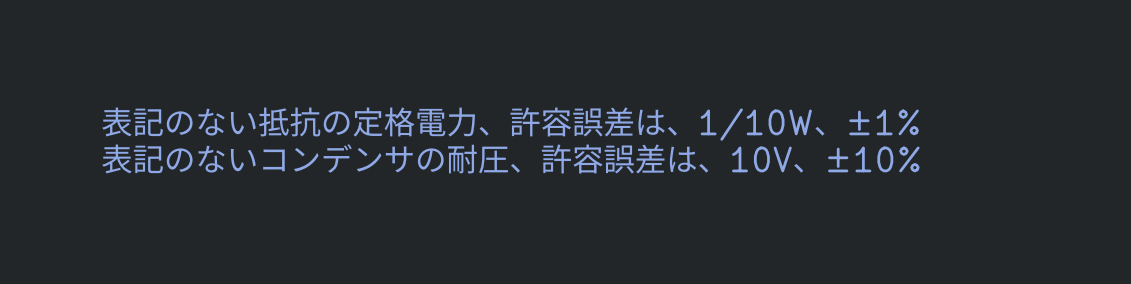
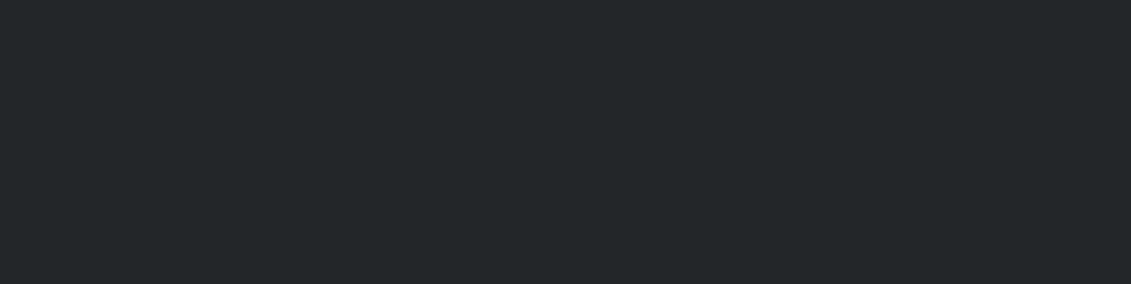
text: 表記のない抵抗の定格電力、許容誤差は、1/10W、±1% (509, 123) -> none
text: 表記のないコンデンサの耐圧、許容誤差は、10V、±10% (510, 158) -> none

